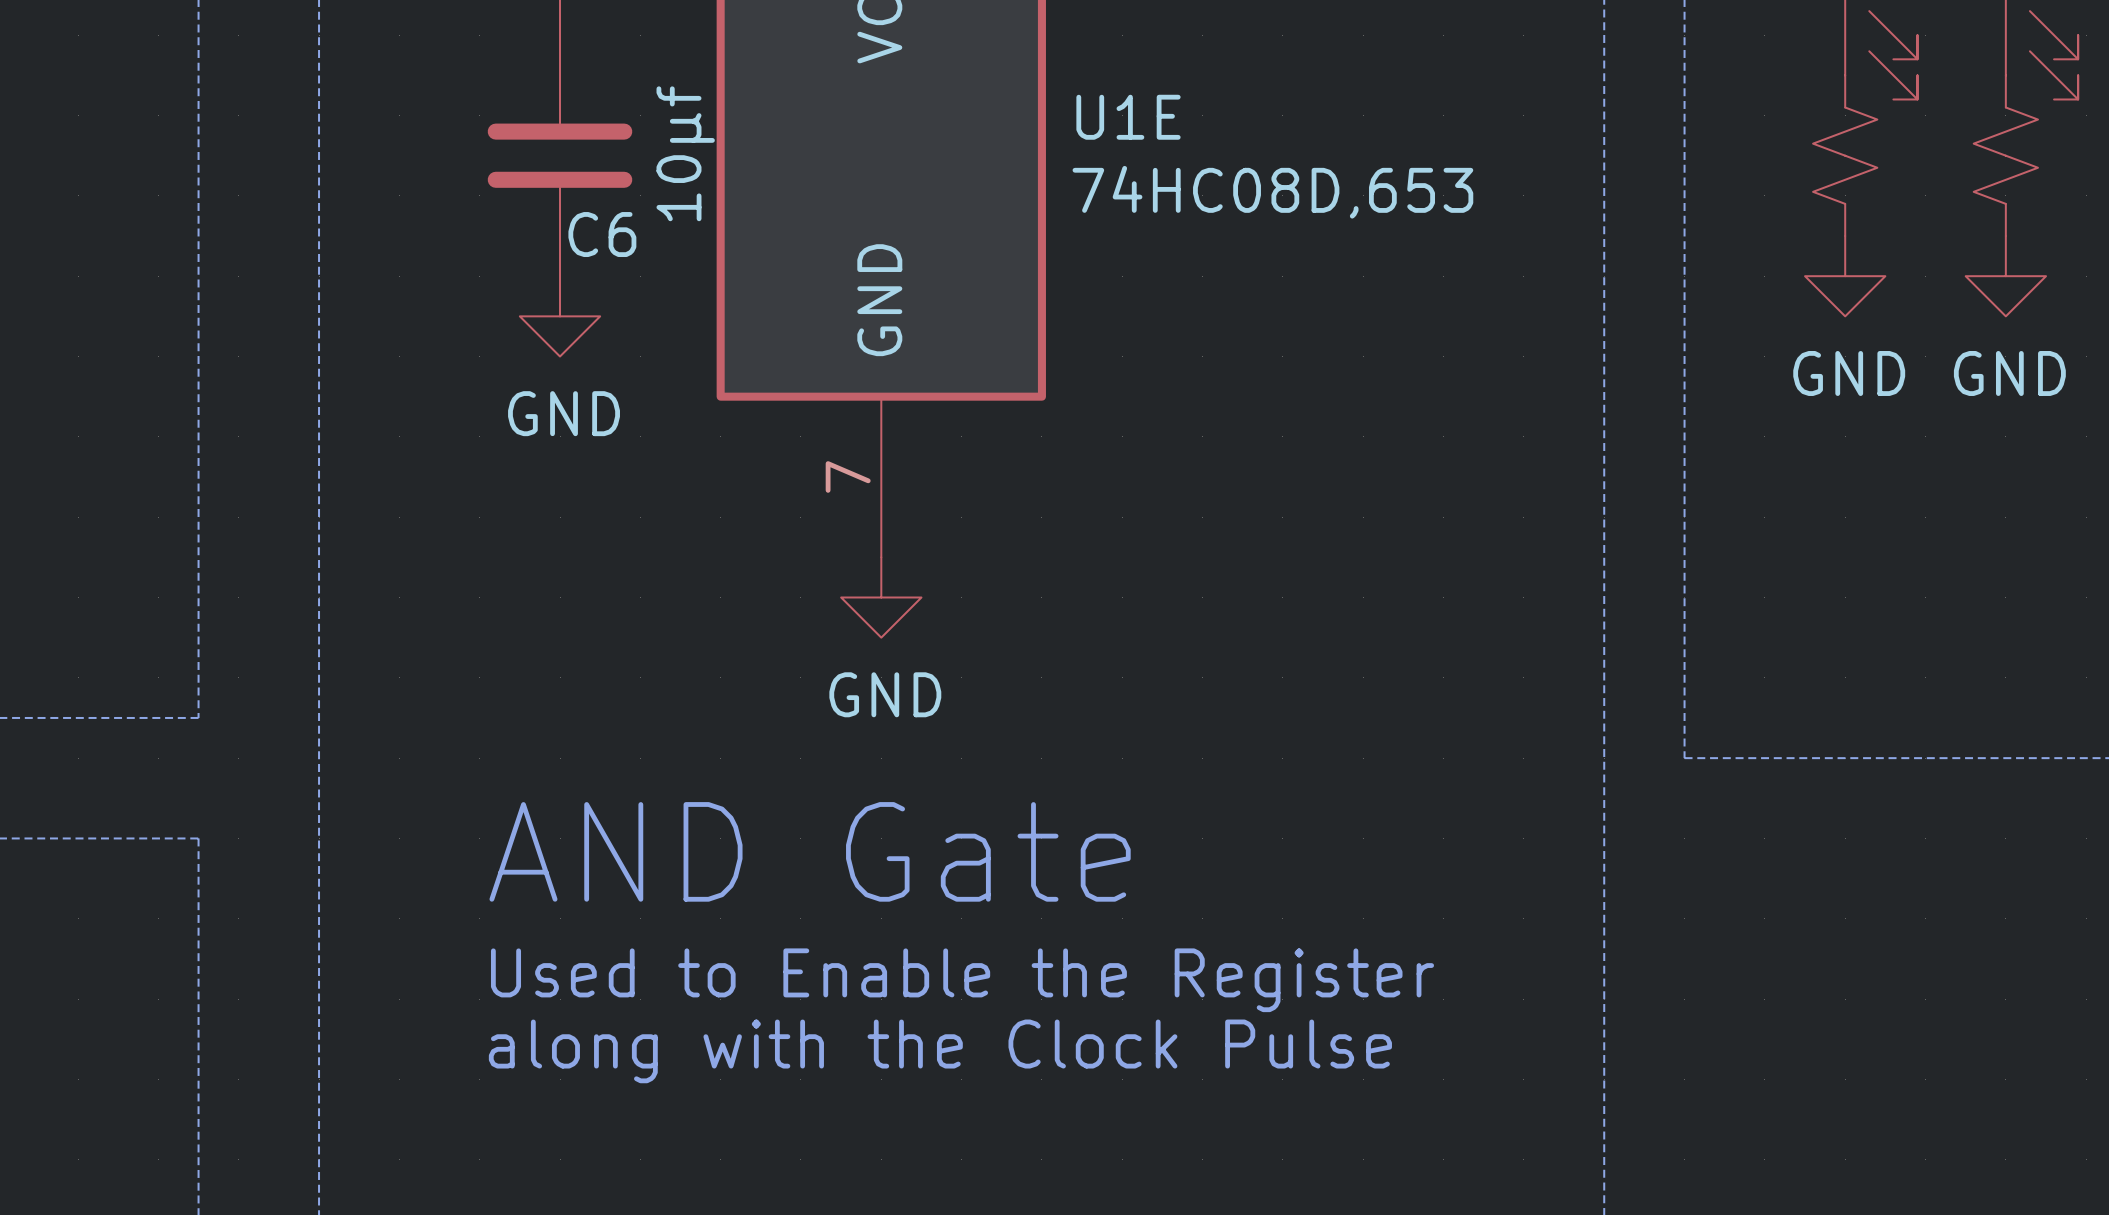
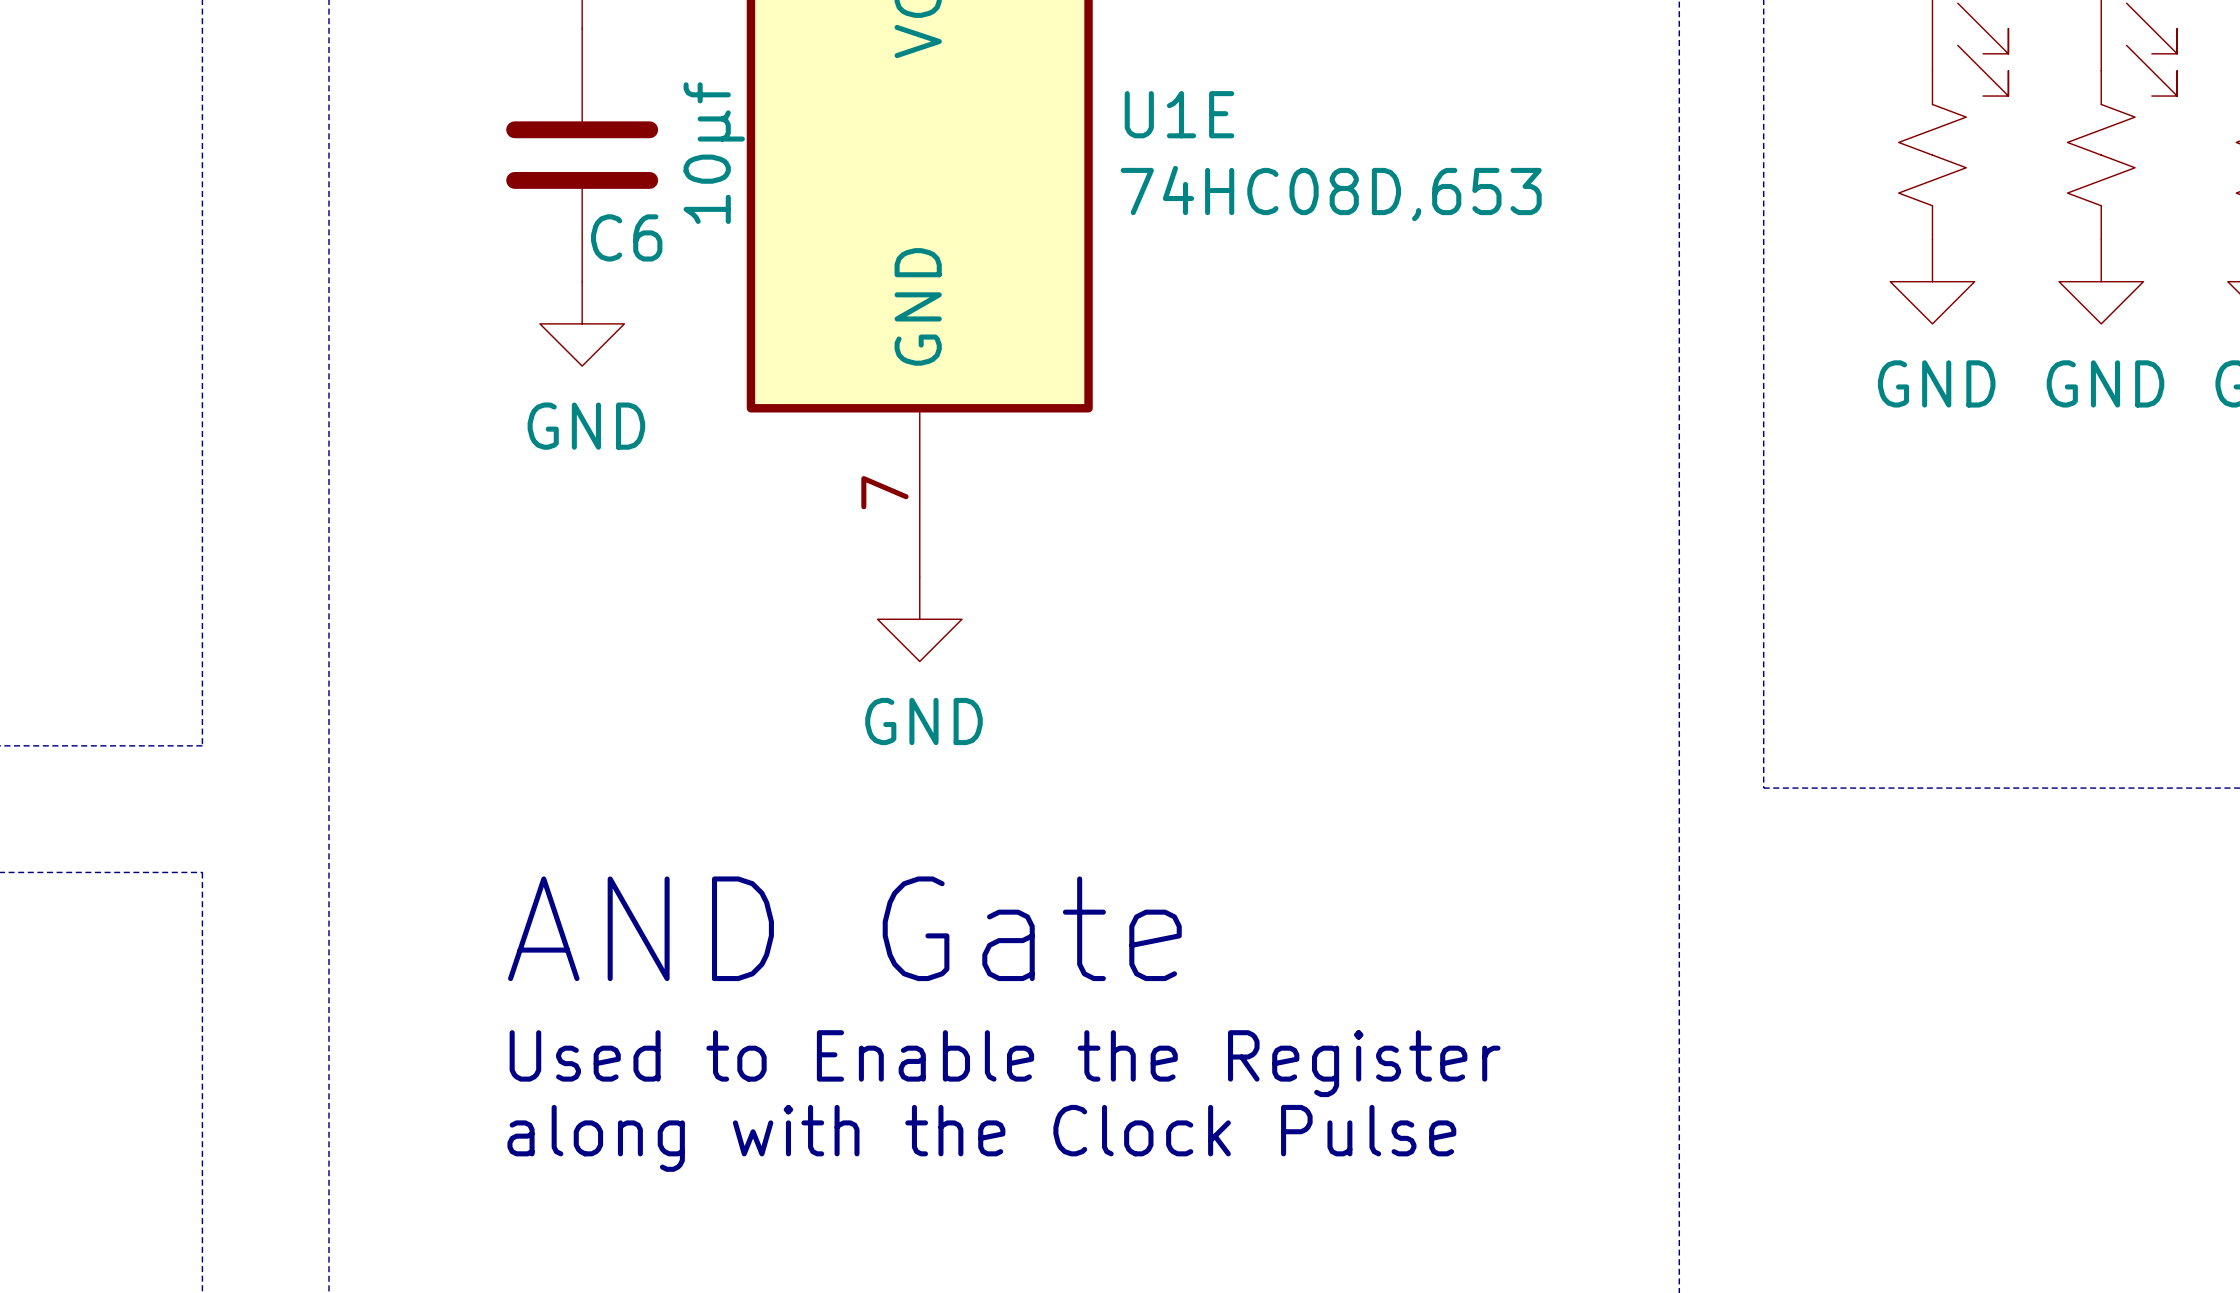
text position: AND Gate (810, 851) -> AND Gate (844, 928)
text position: Used to Enable the Register (962, 980) -> Used to Enable the Register (1005, 1063)
text position: along with the Clock Pulse (940, 1051) -> along with the Clock Pulse (981, 1138)

